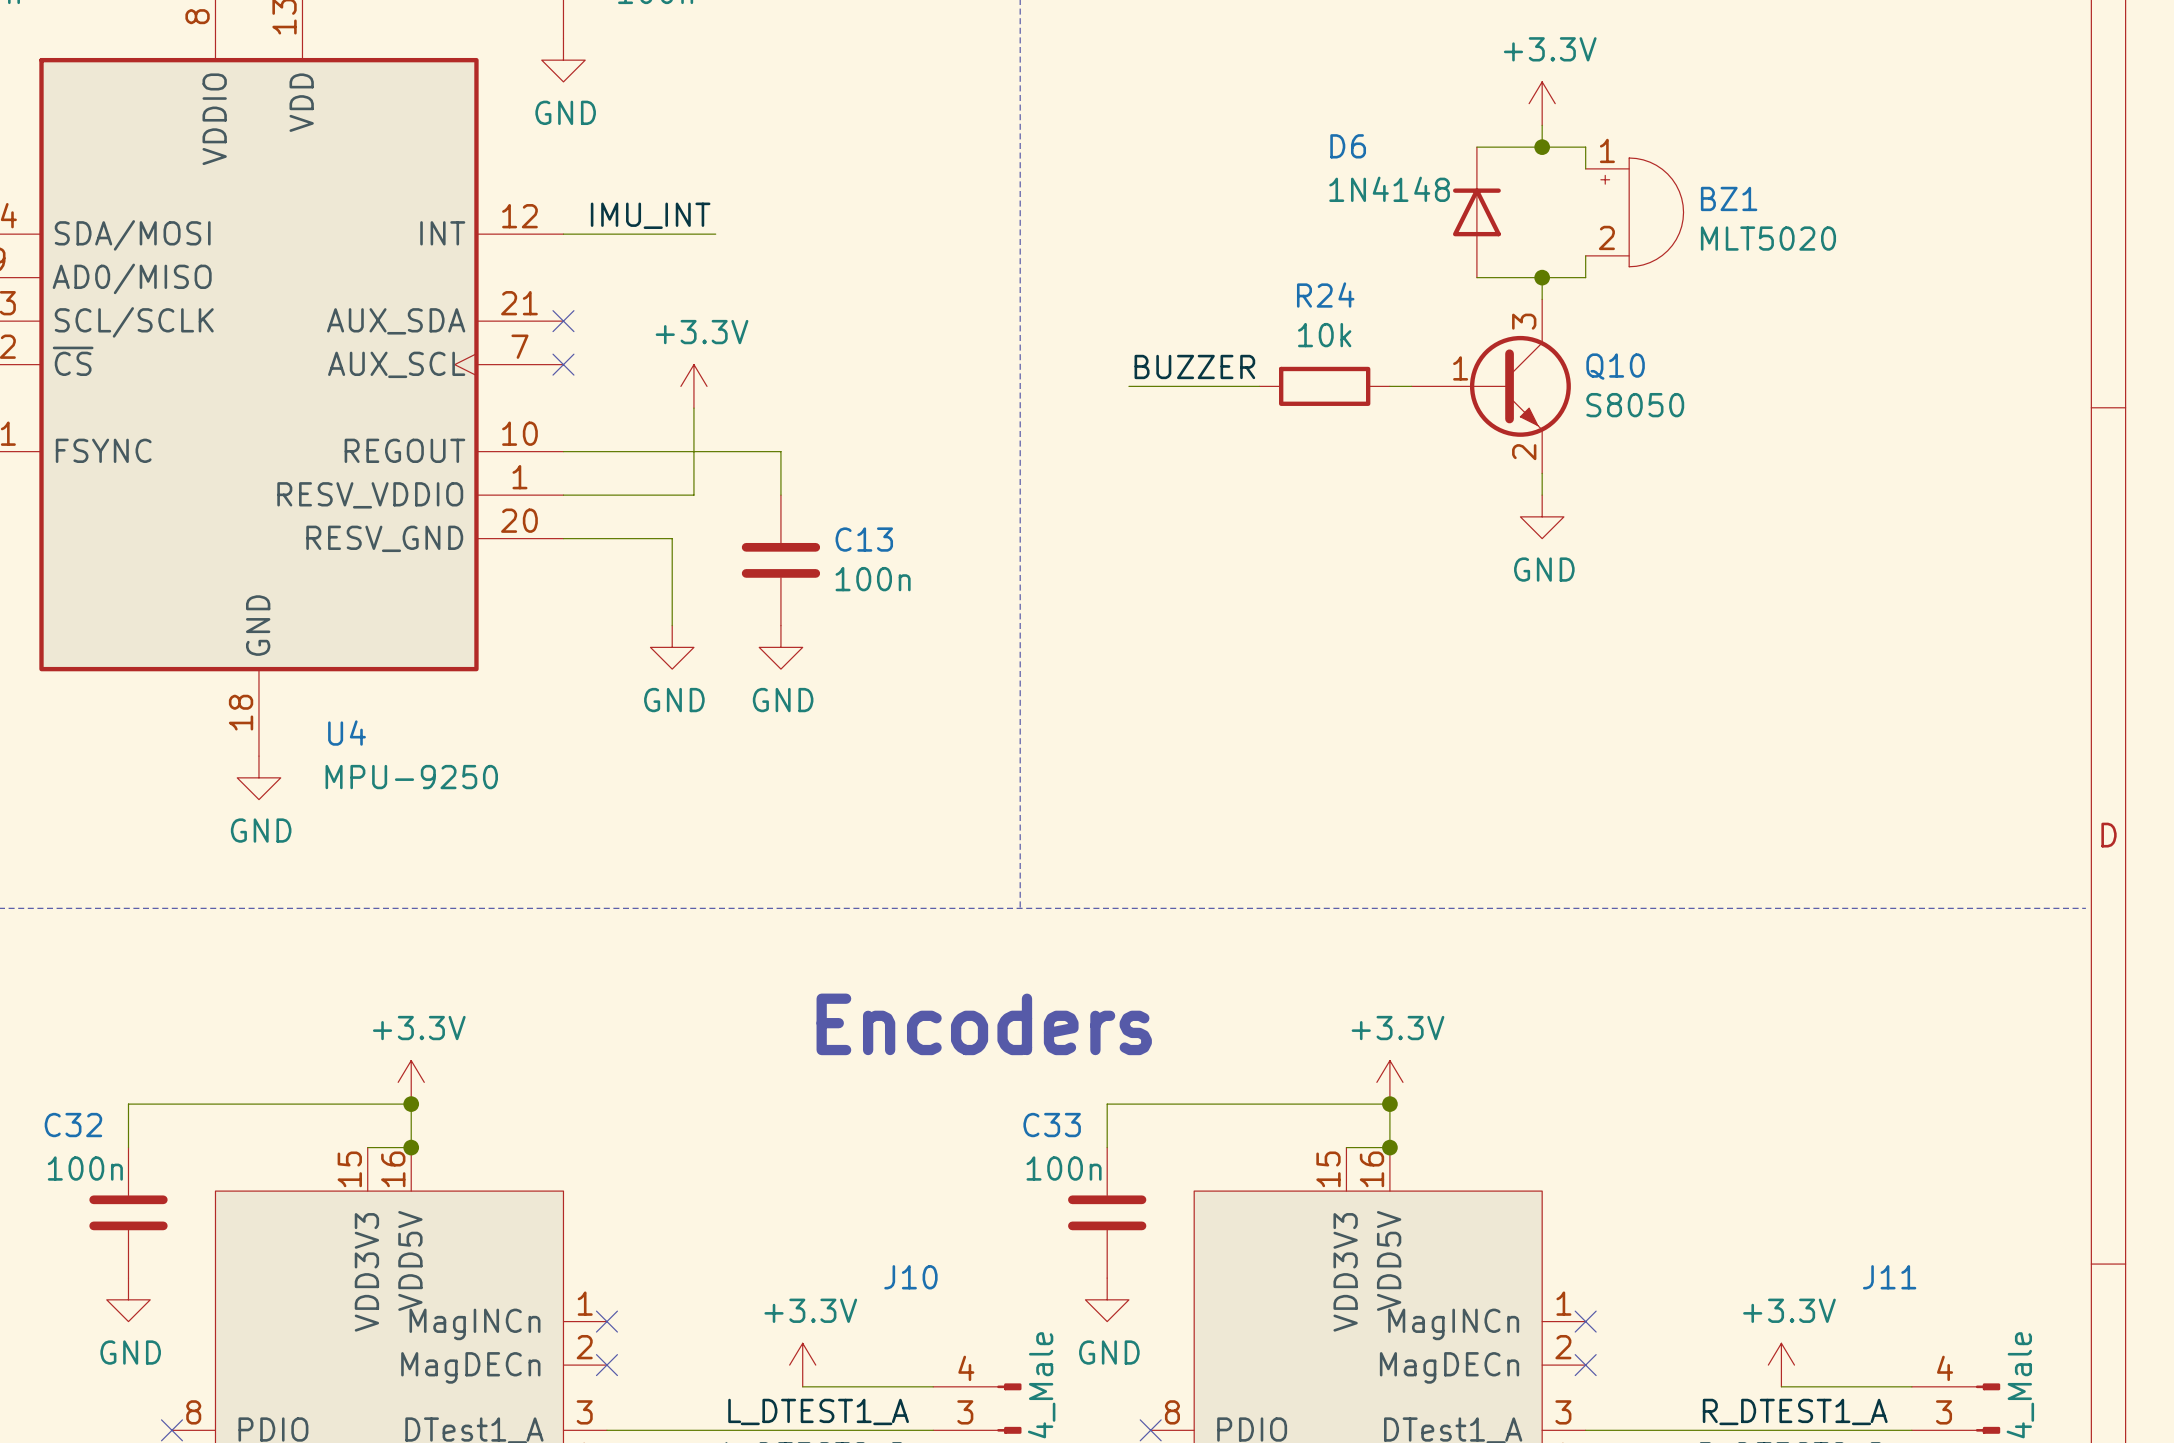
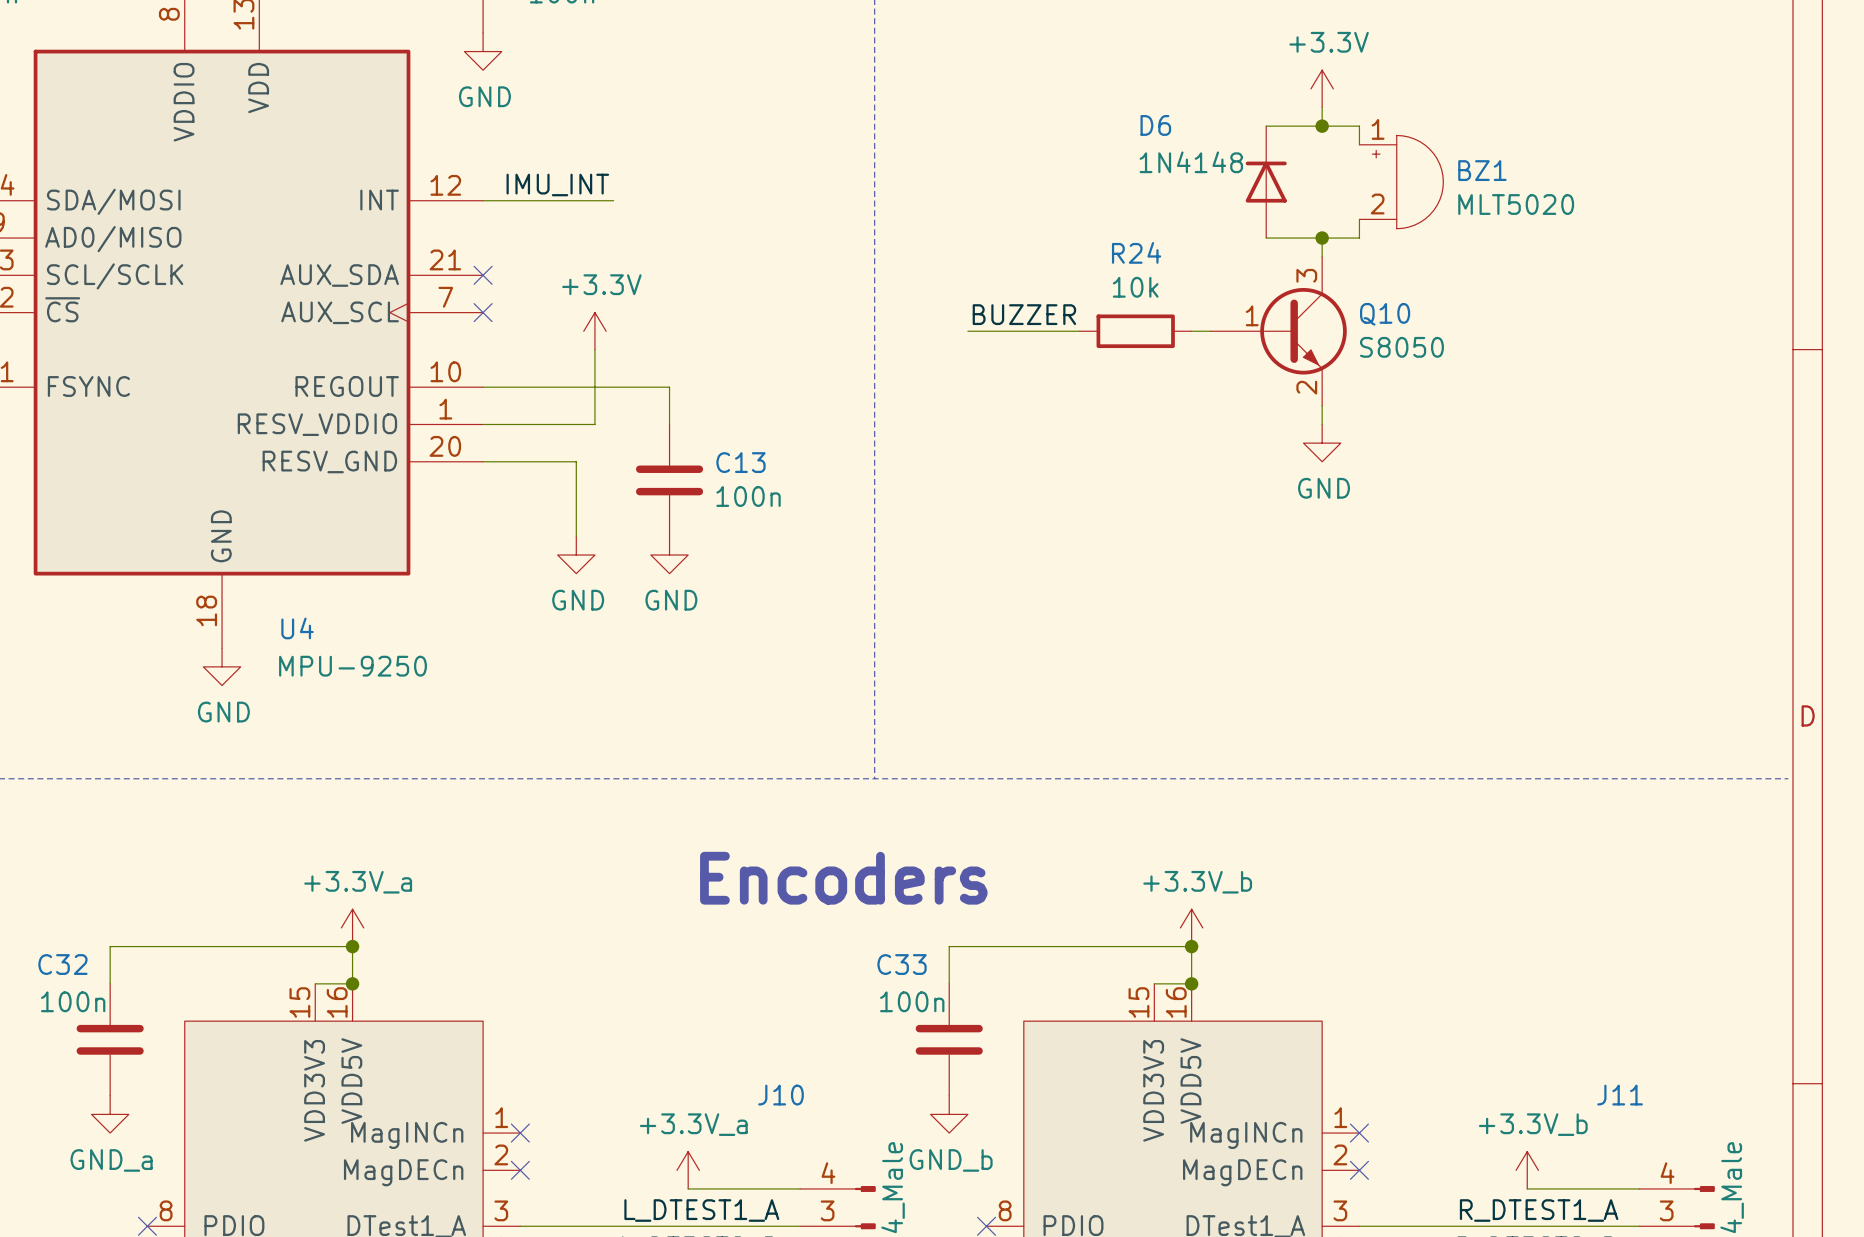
power symbol: +3.3V (411, 1082) -> +3.3V_a (352, 927)
power symbol: +3.3V (1389, 1082) -> +3.3V_b (1191, 927)
power symbol: GND (128, 1299) -> GND_a (110, 1114)
power symbol: GND (1107, 1299) -> GND_b (949, 1114)
power symbol: +3.3V (802, 1365) -> +3.3V_a (688, 1170)
power symbol: +3.3V (1781, 1365) -> +3.3V_b (1527, 1170)

